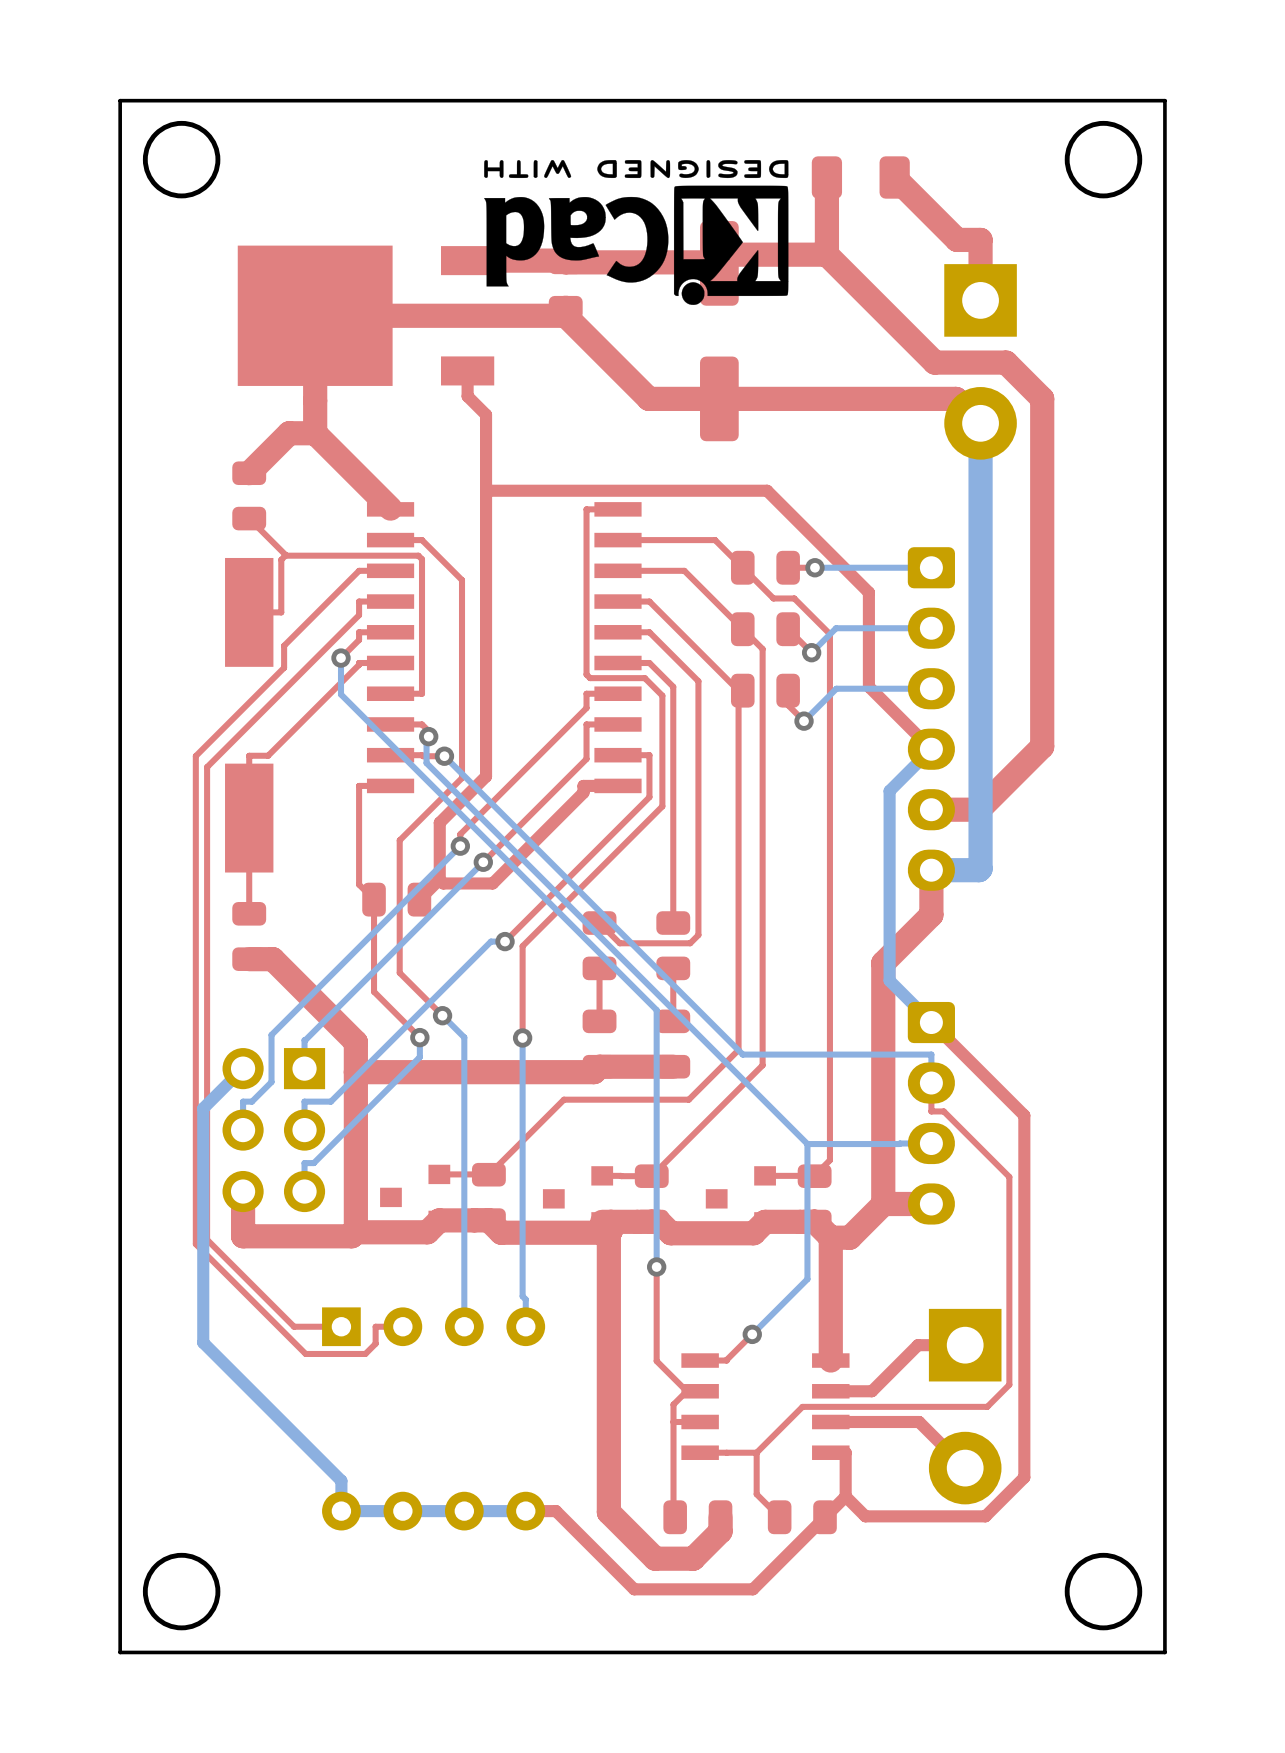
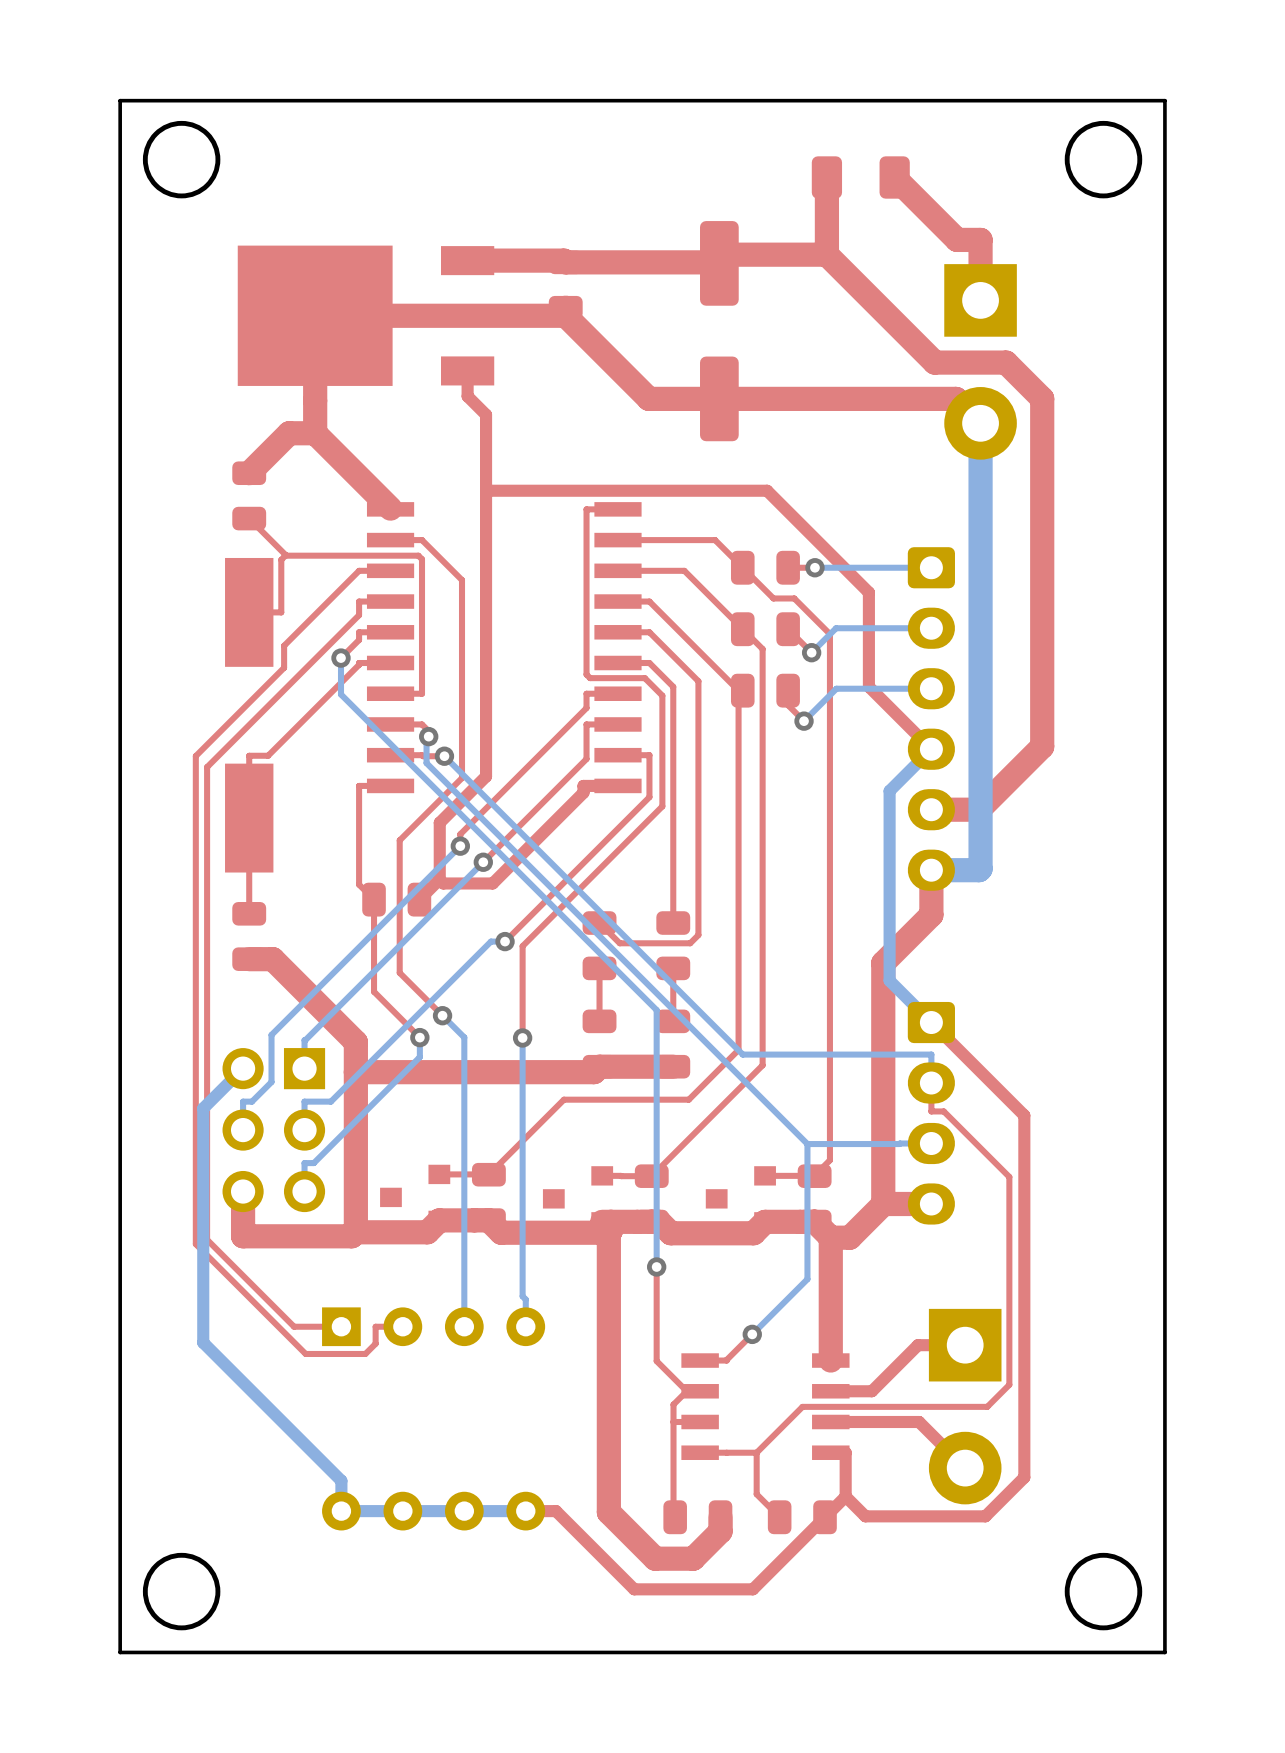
drawing: [484, 160, 789, 305] -> none

